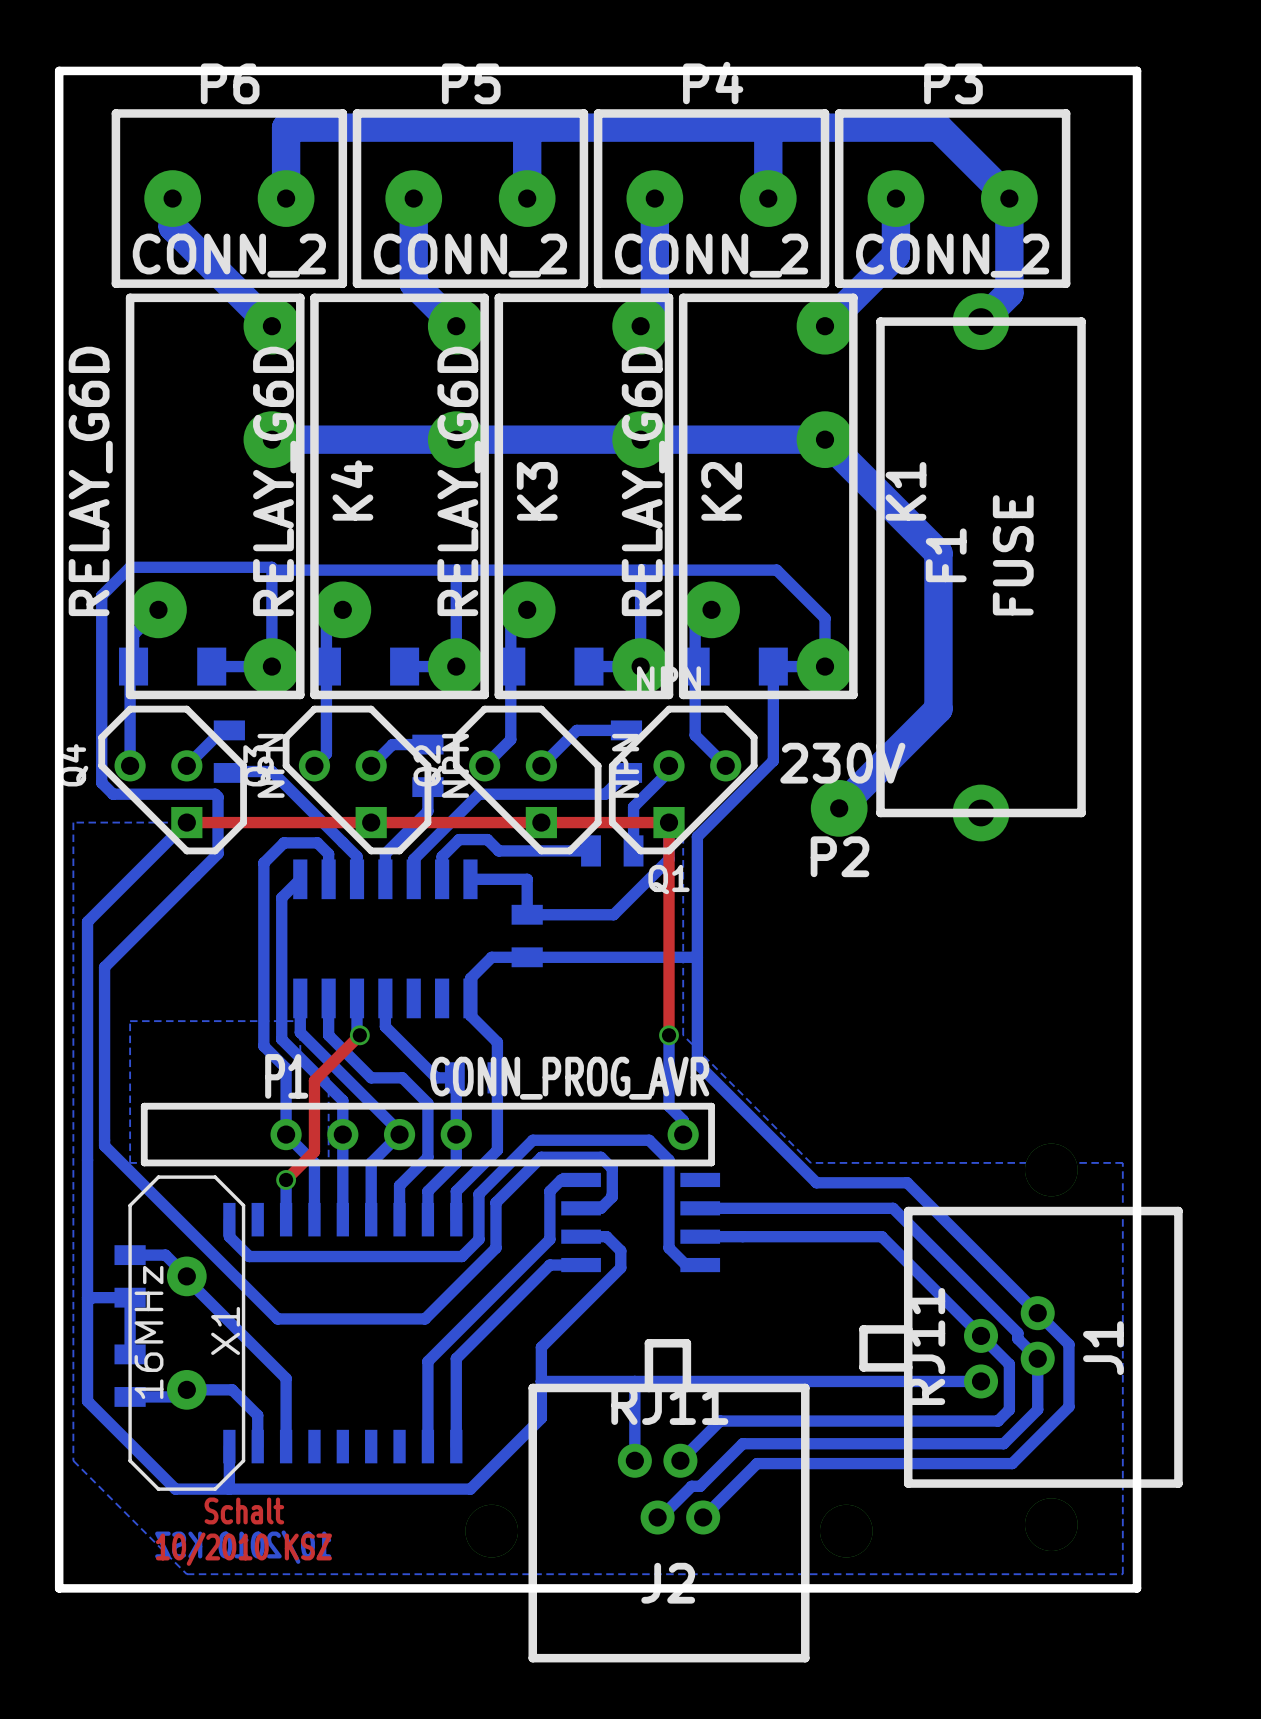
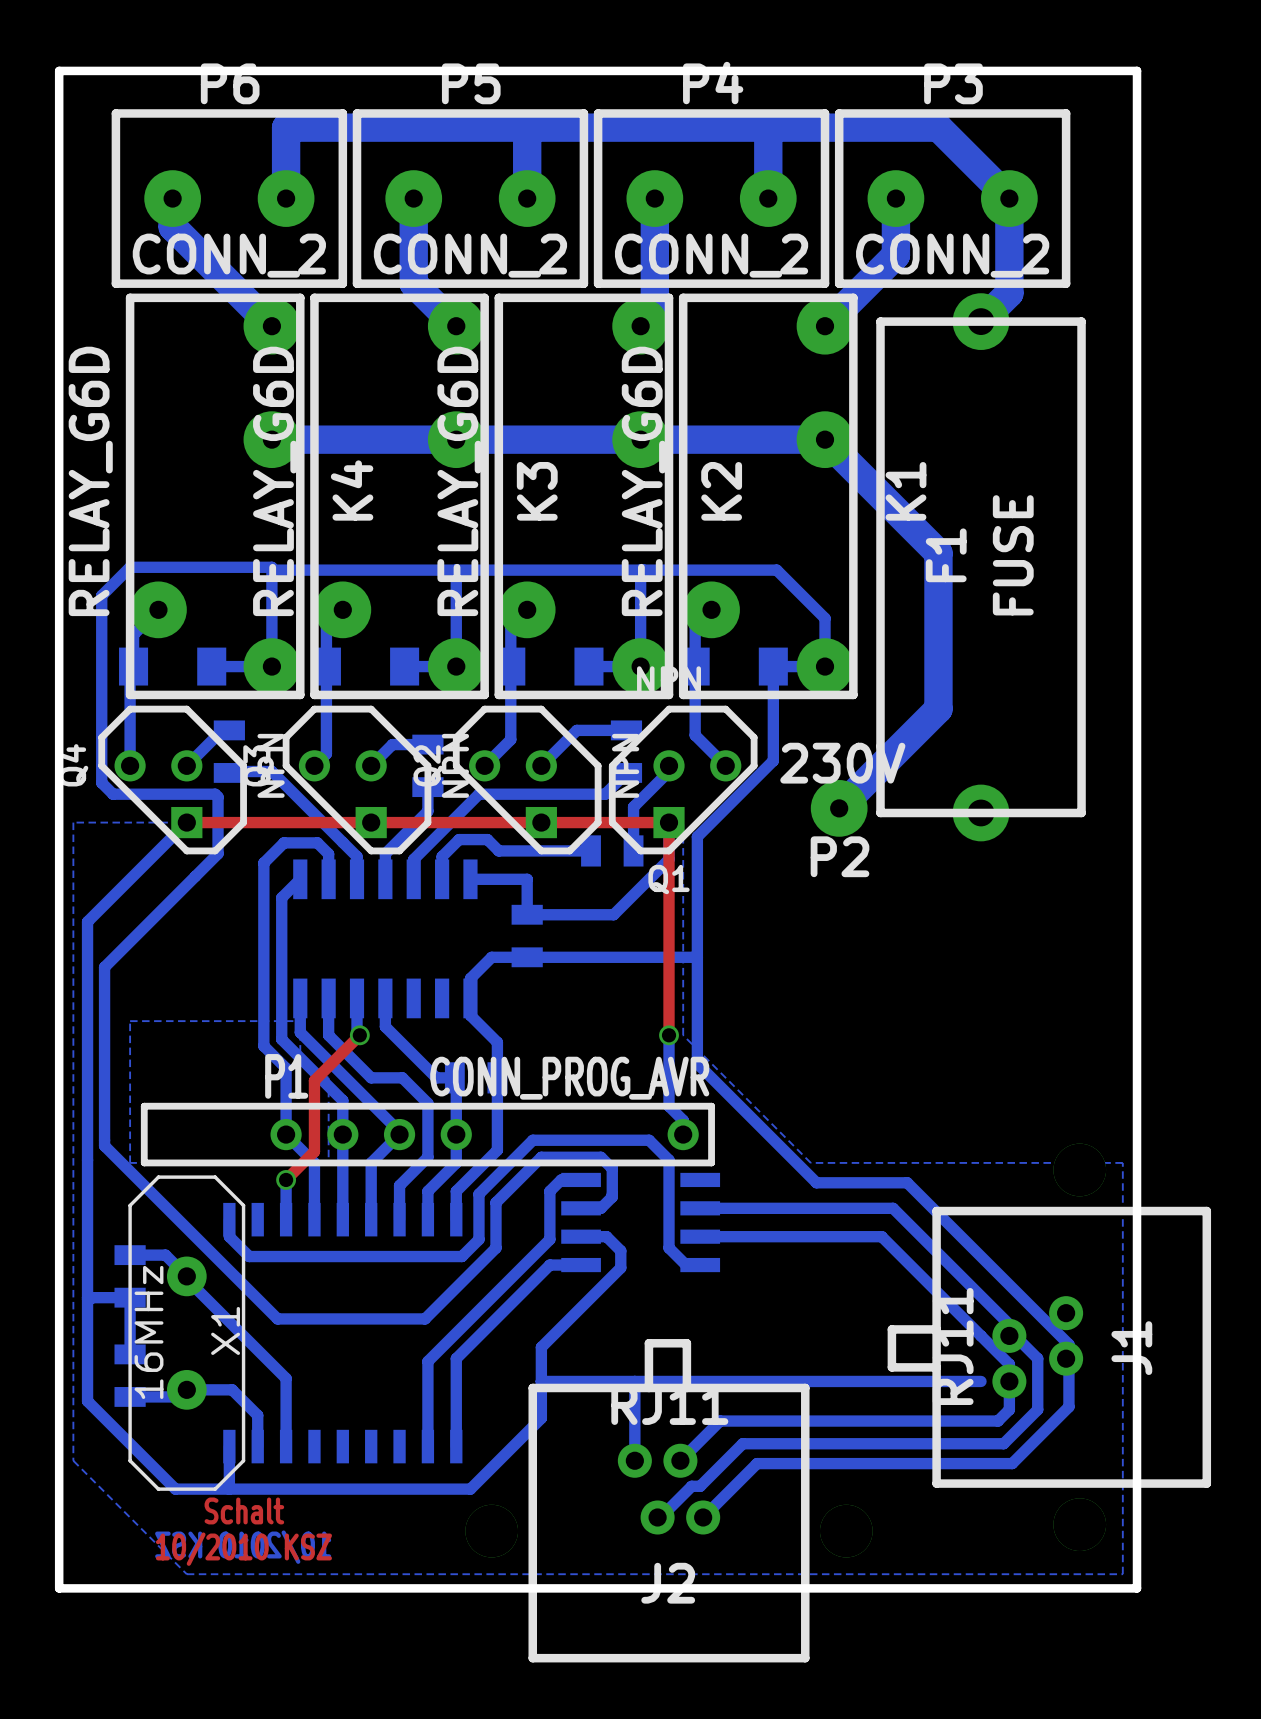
J1 position: (1020, 1347) -> (1049, 1347)

